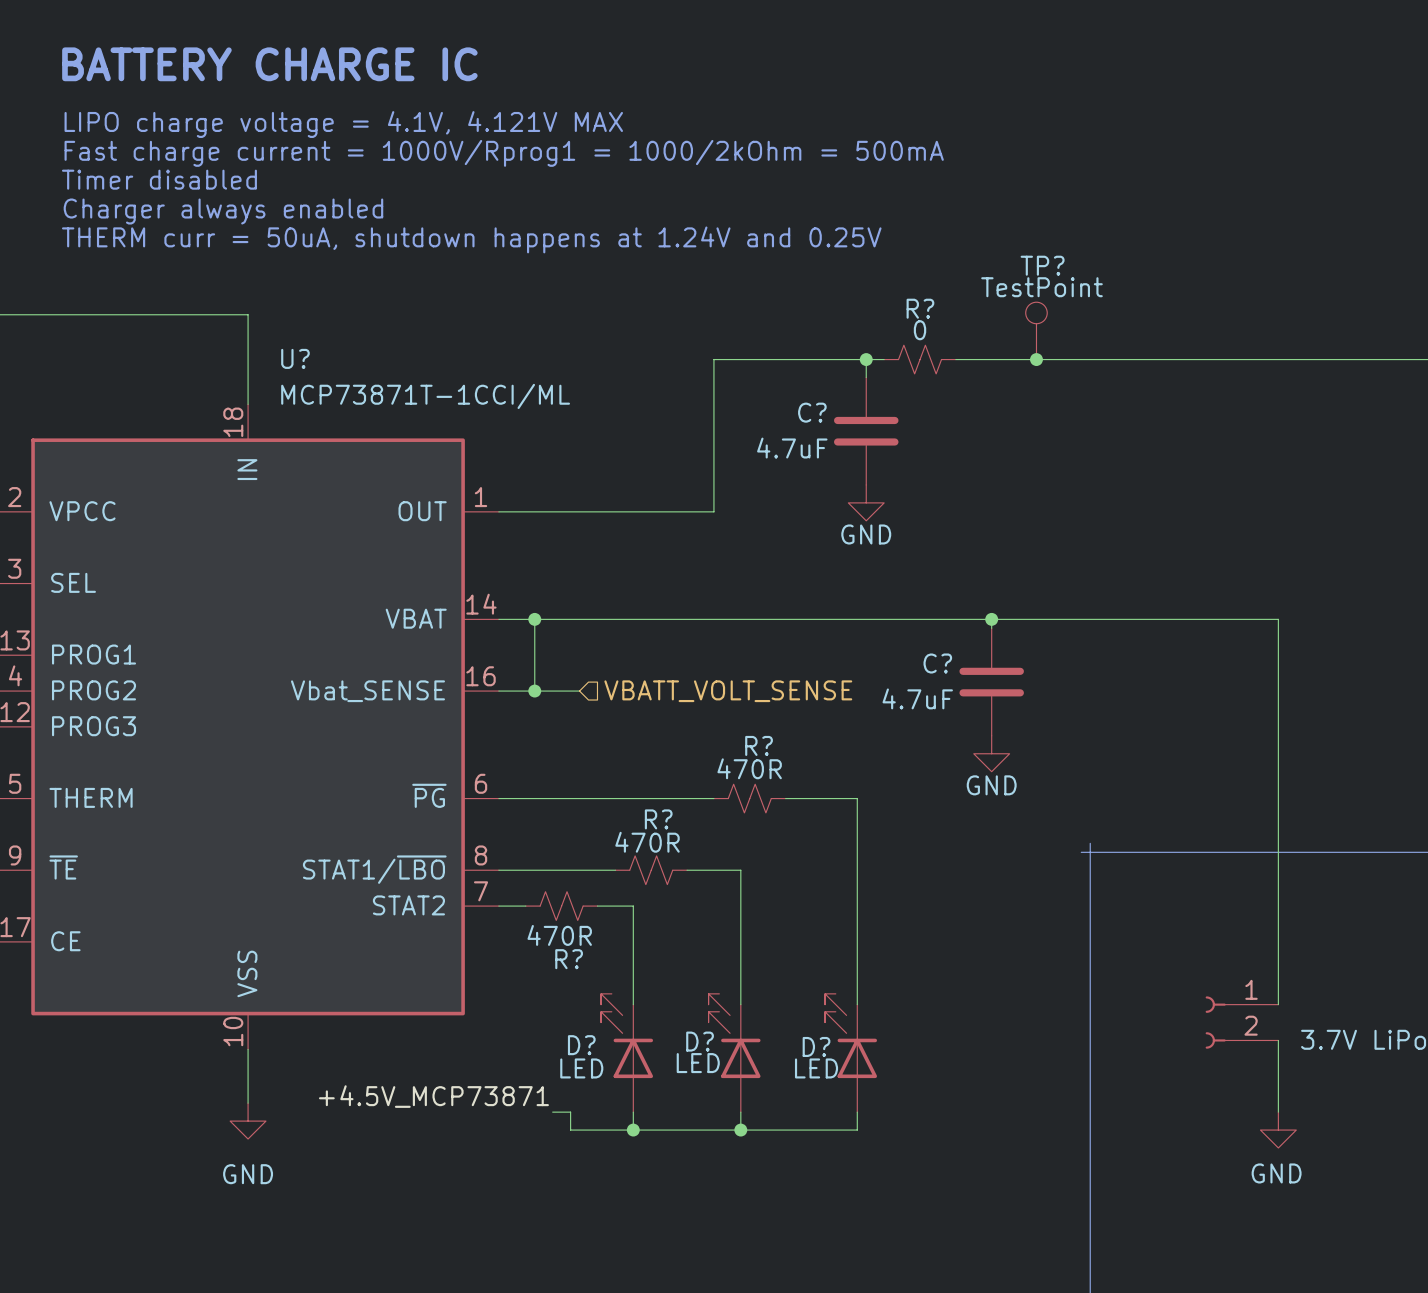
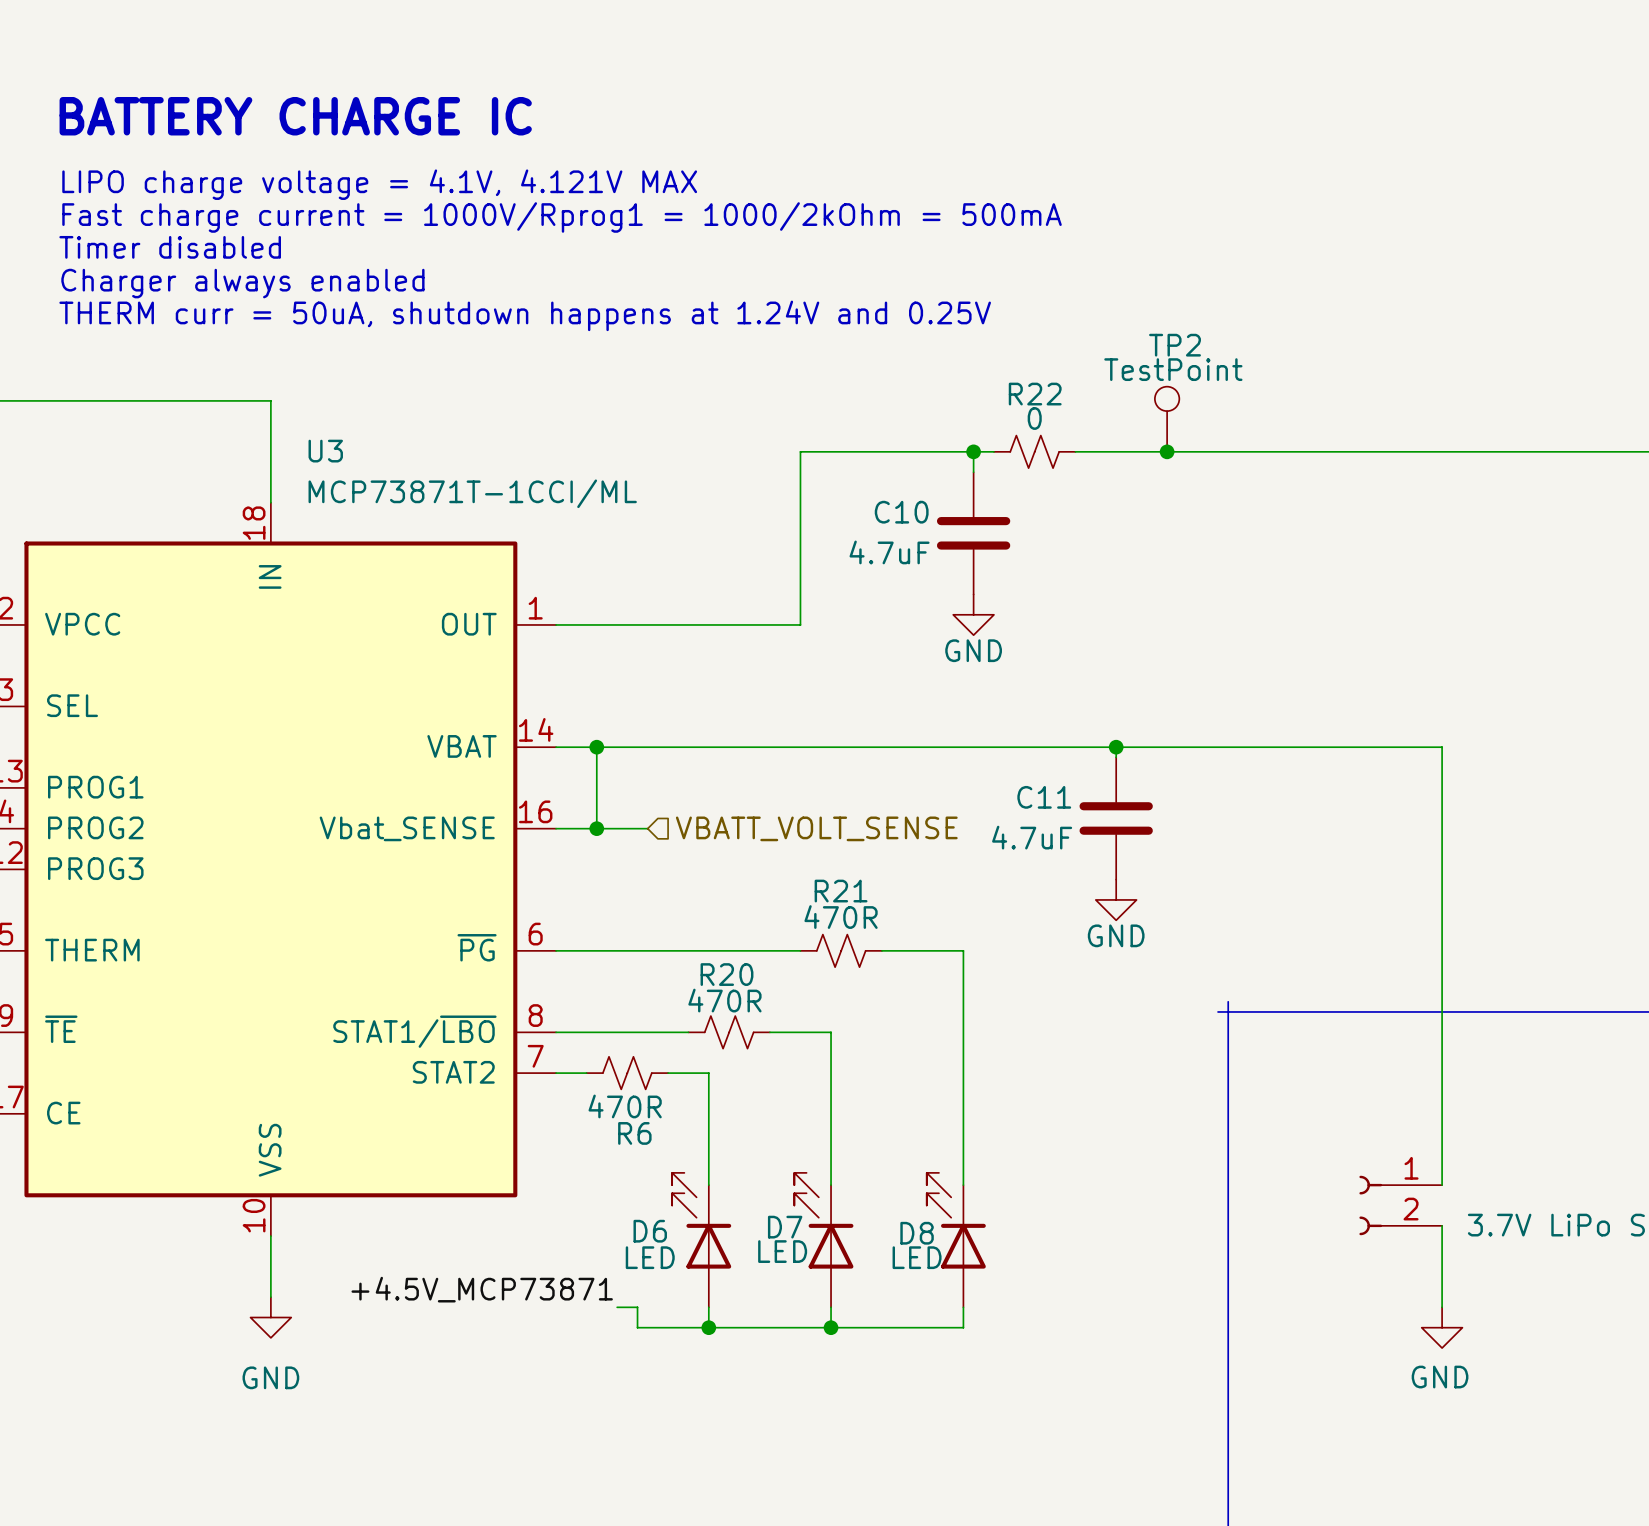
TP? name: TP? (1042, 265) -> TP2 (1175, 345)
R? name: R? (920, 308) -> R22 (1035, 394)
U? name: U? (295, 358) -> U3 (325, 451)
C? name: C? (812, 412) -> C10 (901, 512)
C? name: C? (937, 663) -> C11 (1044, 797)
R? name: R? (759, 745) -> R21 (841, 891)
R? name: R? (658, 819) -> R20 (726, 974)
R? name: R? (569, 959) -> R6 (634, 1133)
D? name: D? (700, 1041) -> D7 (785, 1227)
D? name: D? (581, 1045) -> D6 (650, 1231)
D? name: D? (816, 1046) -> D8 (917, 1233)

